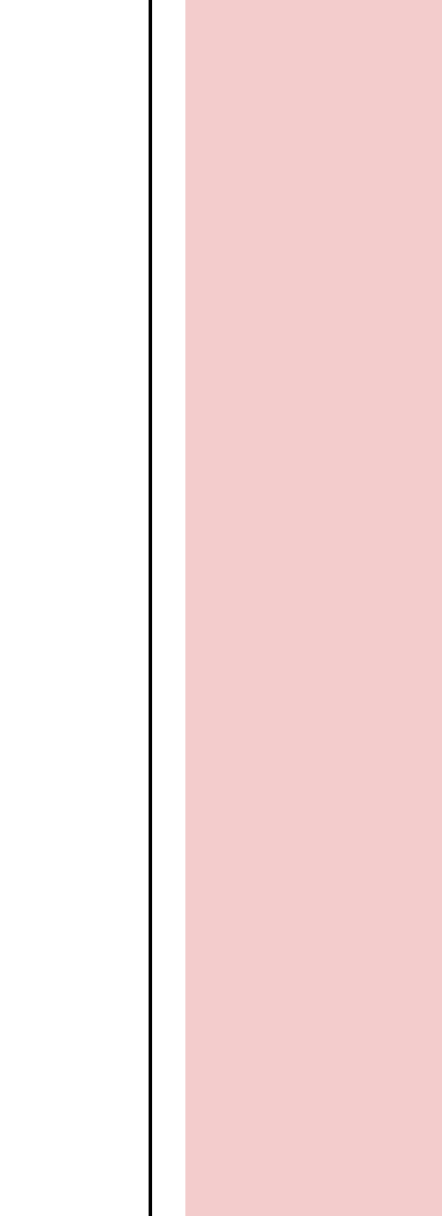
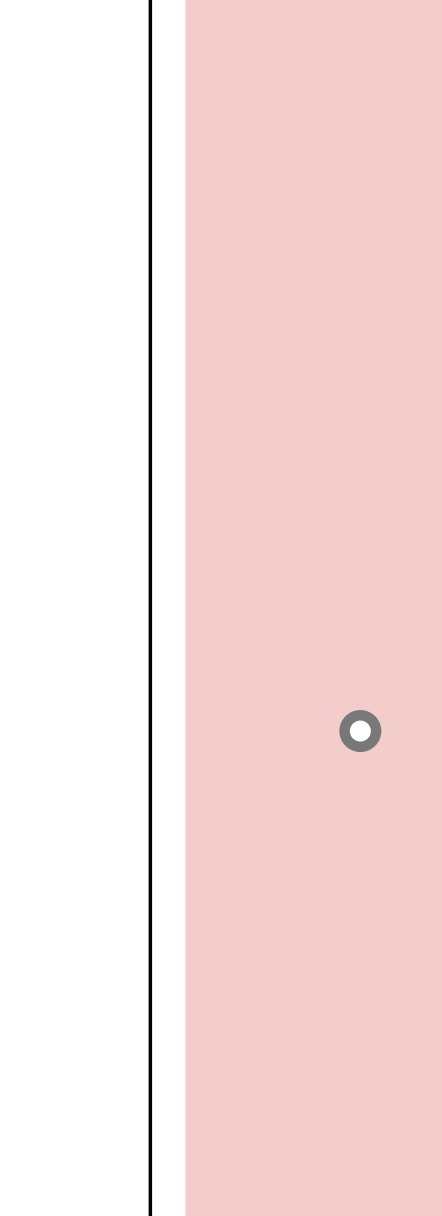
via: none -> (360, 731)

